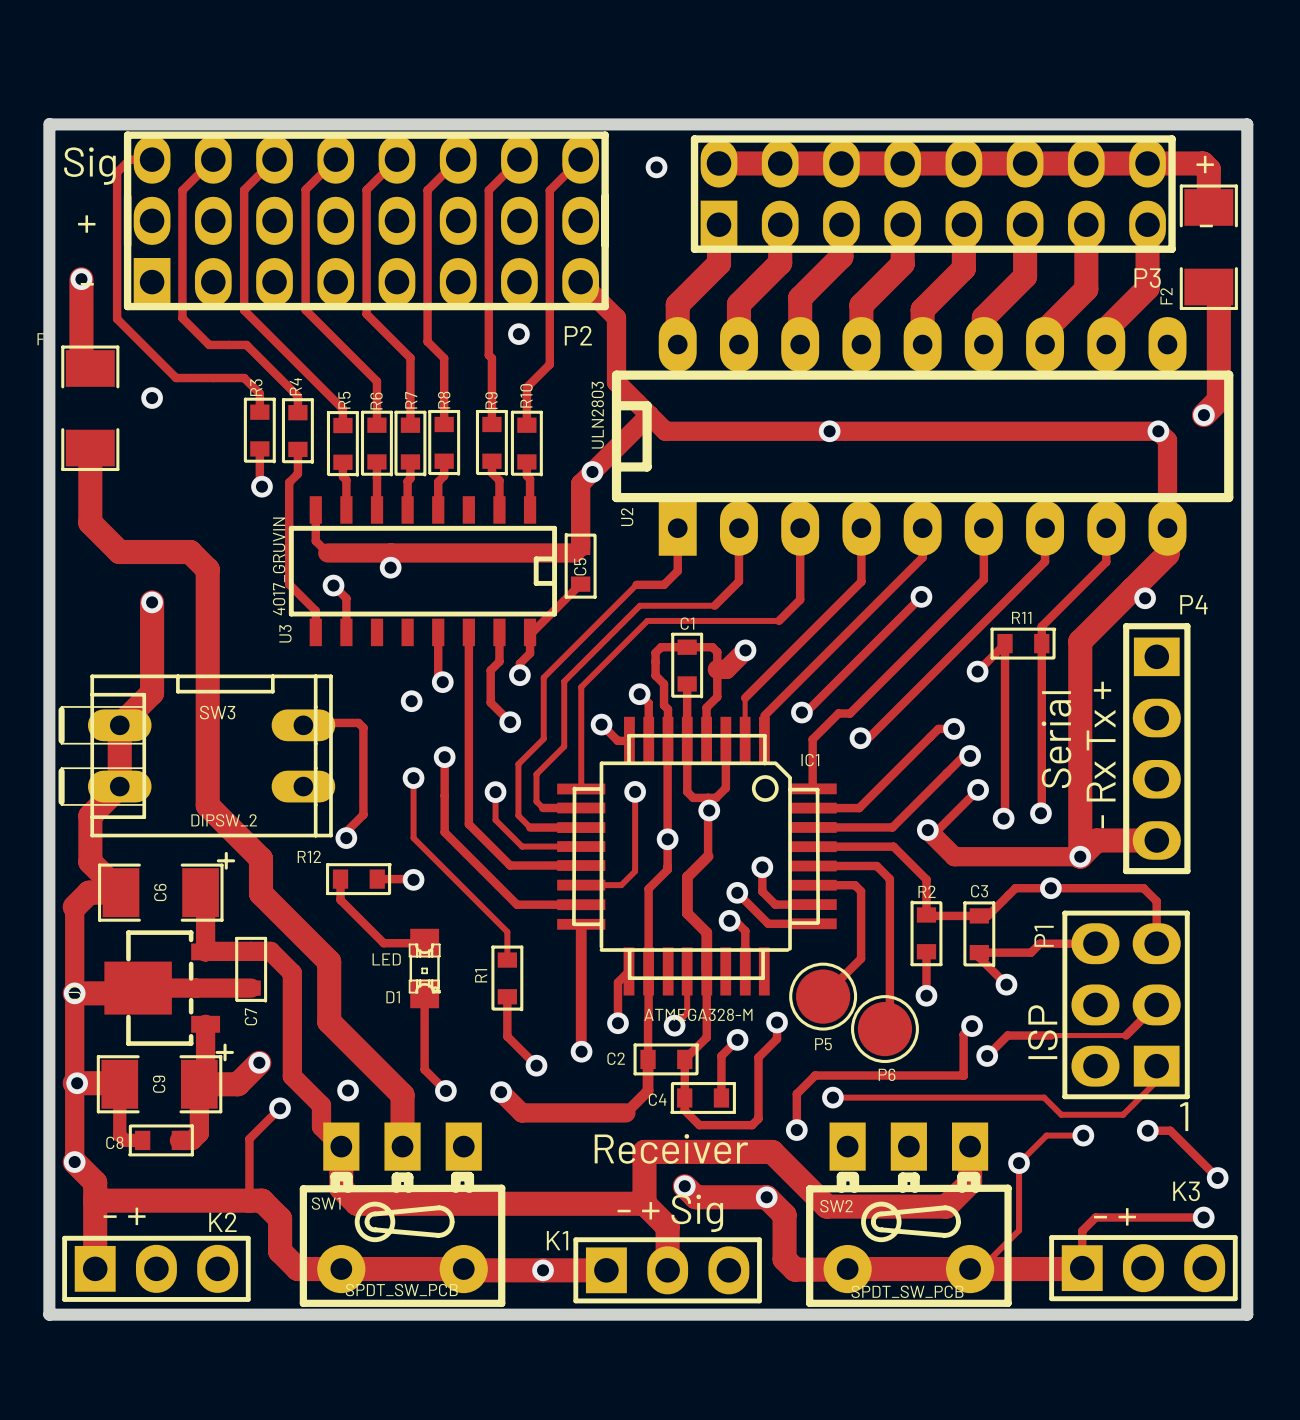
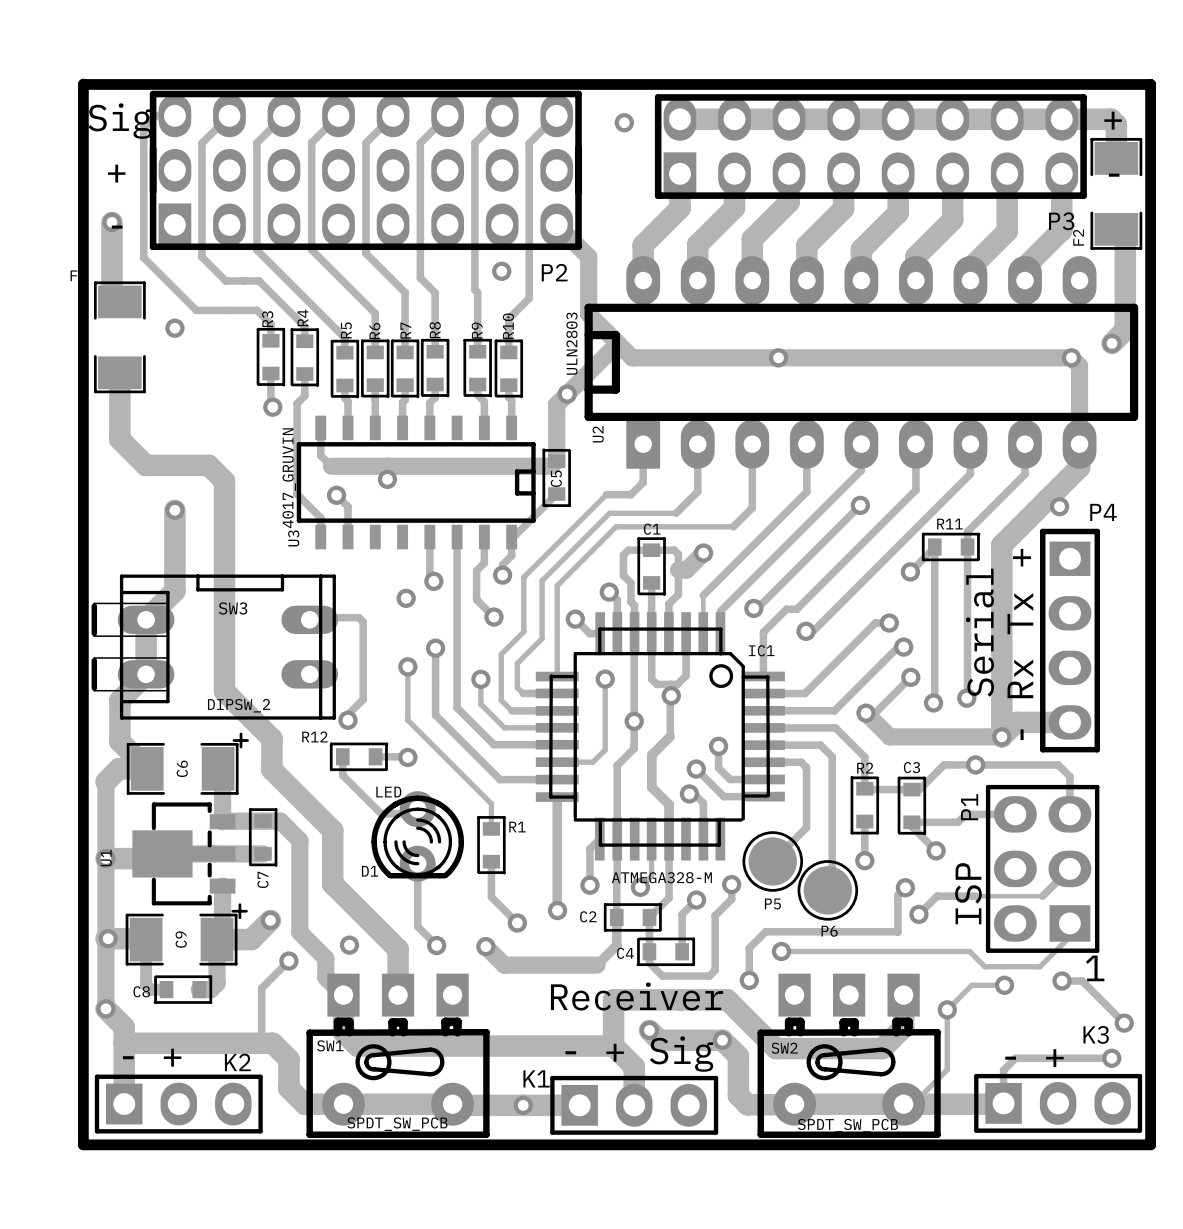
D1 footprint: [408, 928, 441, 1009] -> [371, 791, 465, 882]
R1 name rotation: 0° (481, 975) -> 90° clockwise (517, 827)
R1 name position: R1 (481, 975) -> R1 (517, 827)

